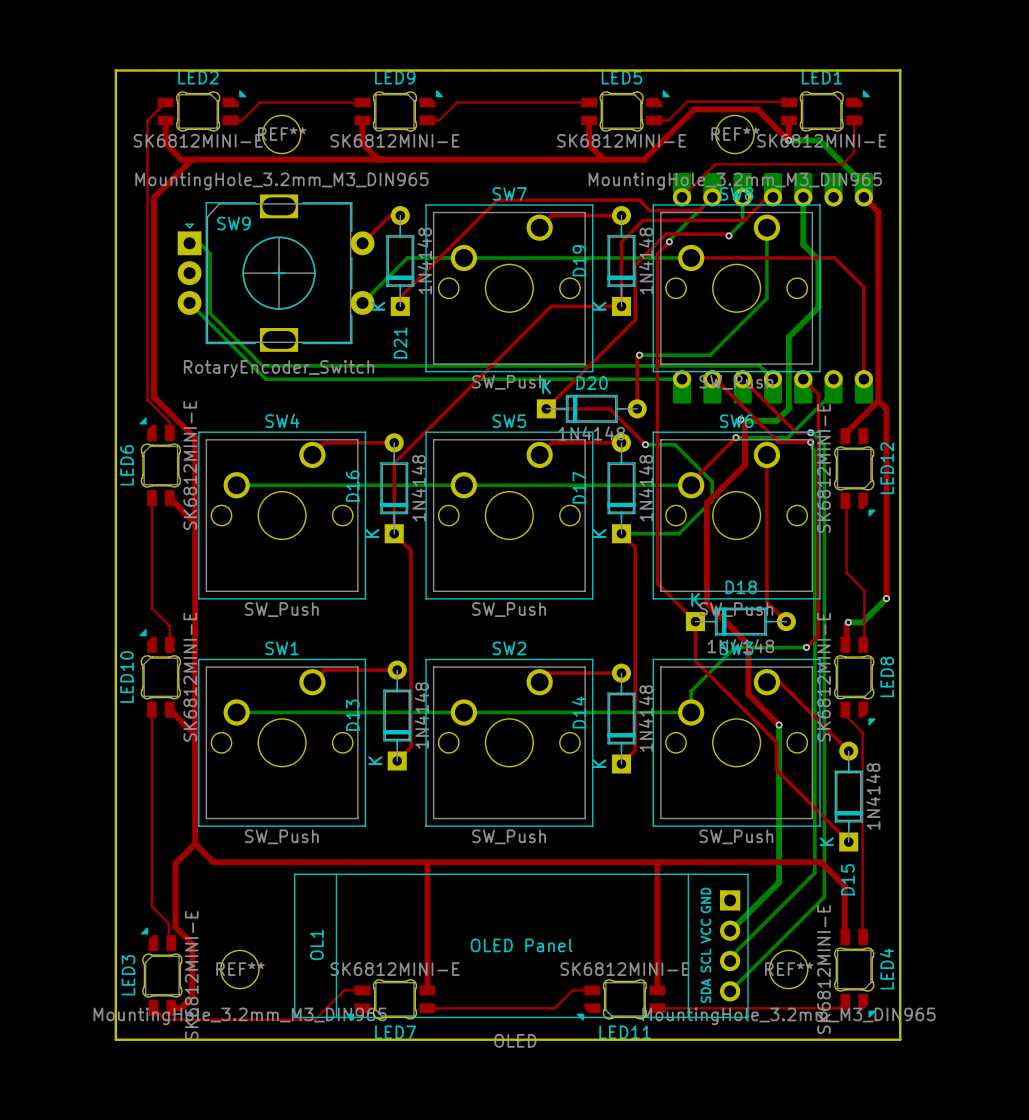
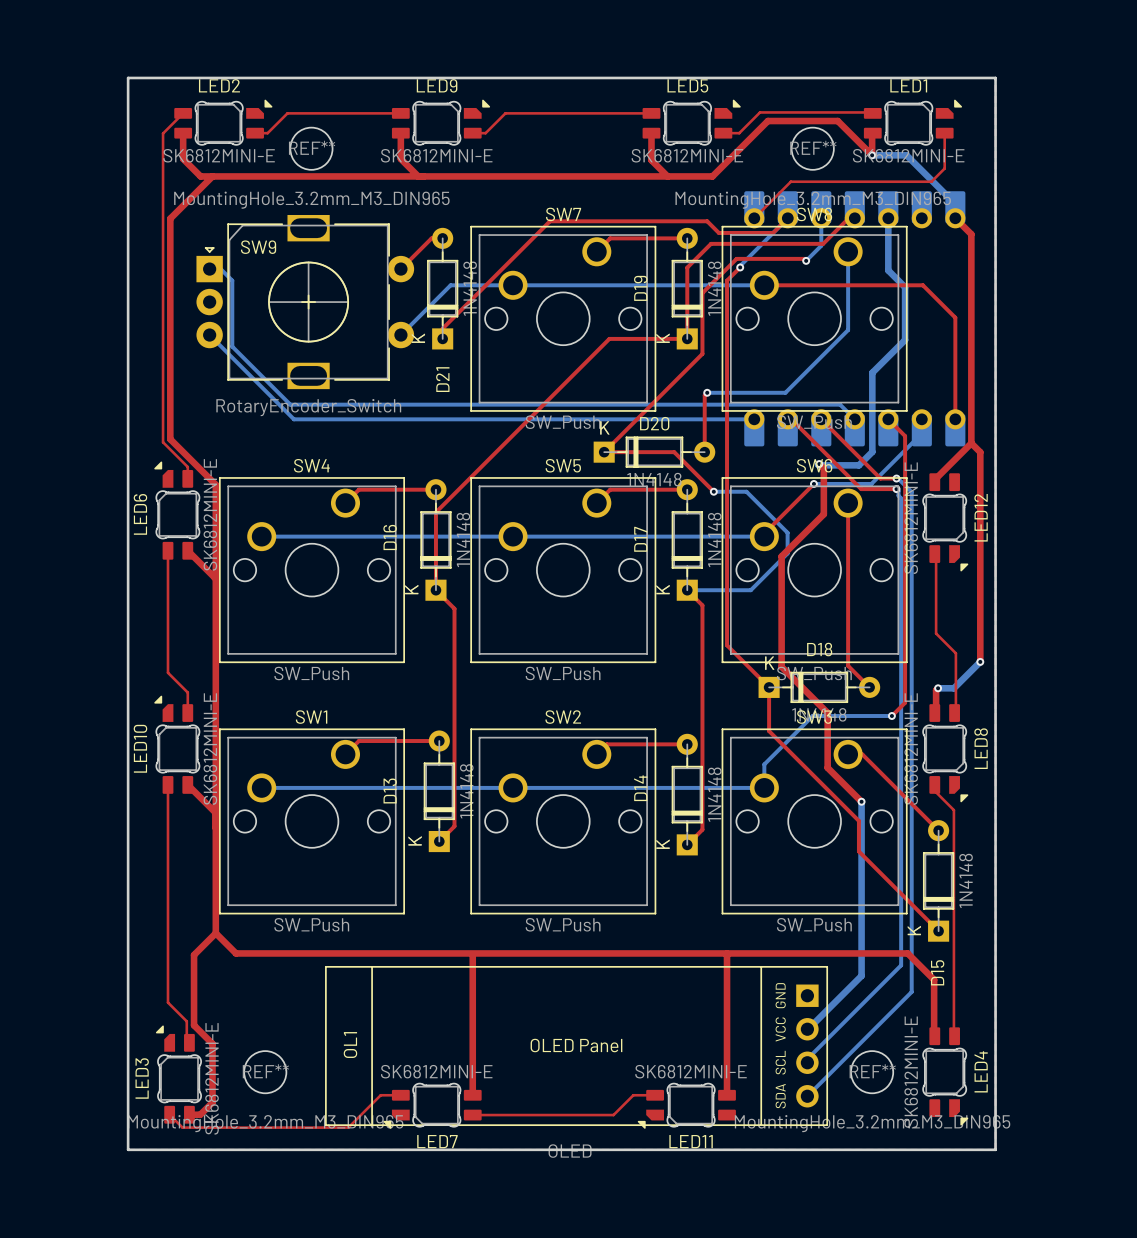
top track: (845, 1002) (839, 1008) (657, 1008) -> none

